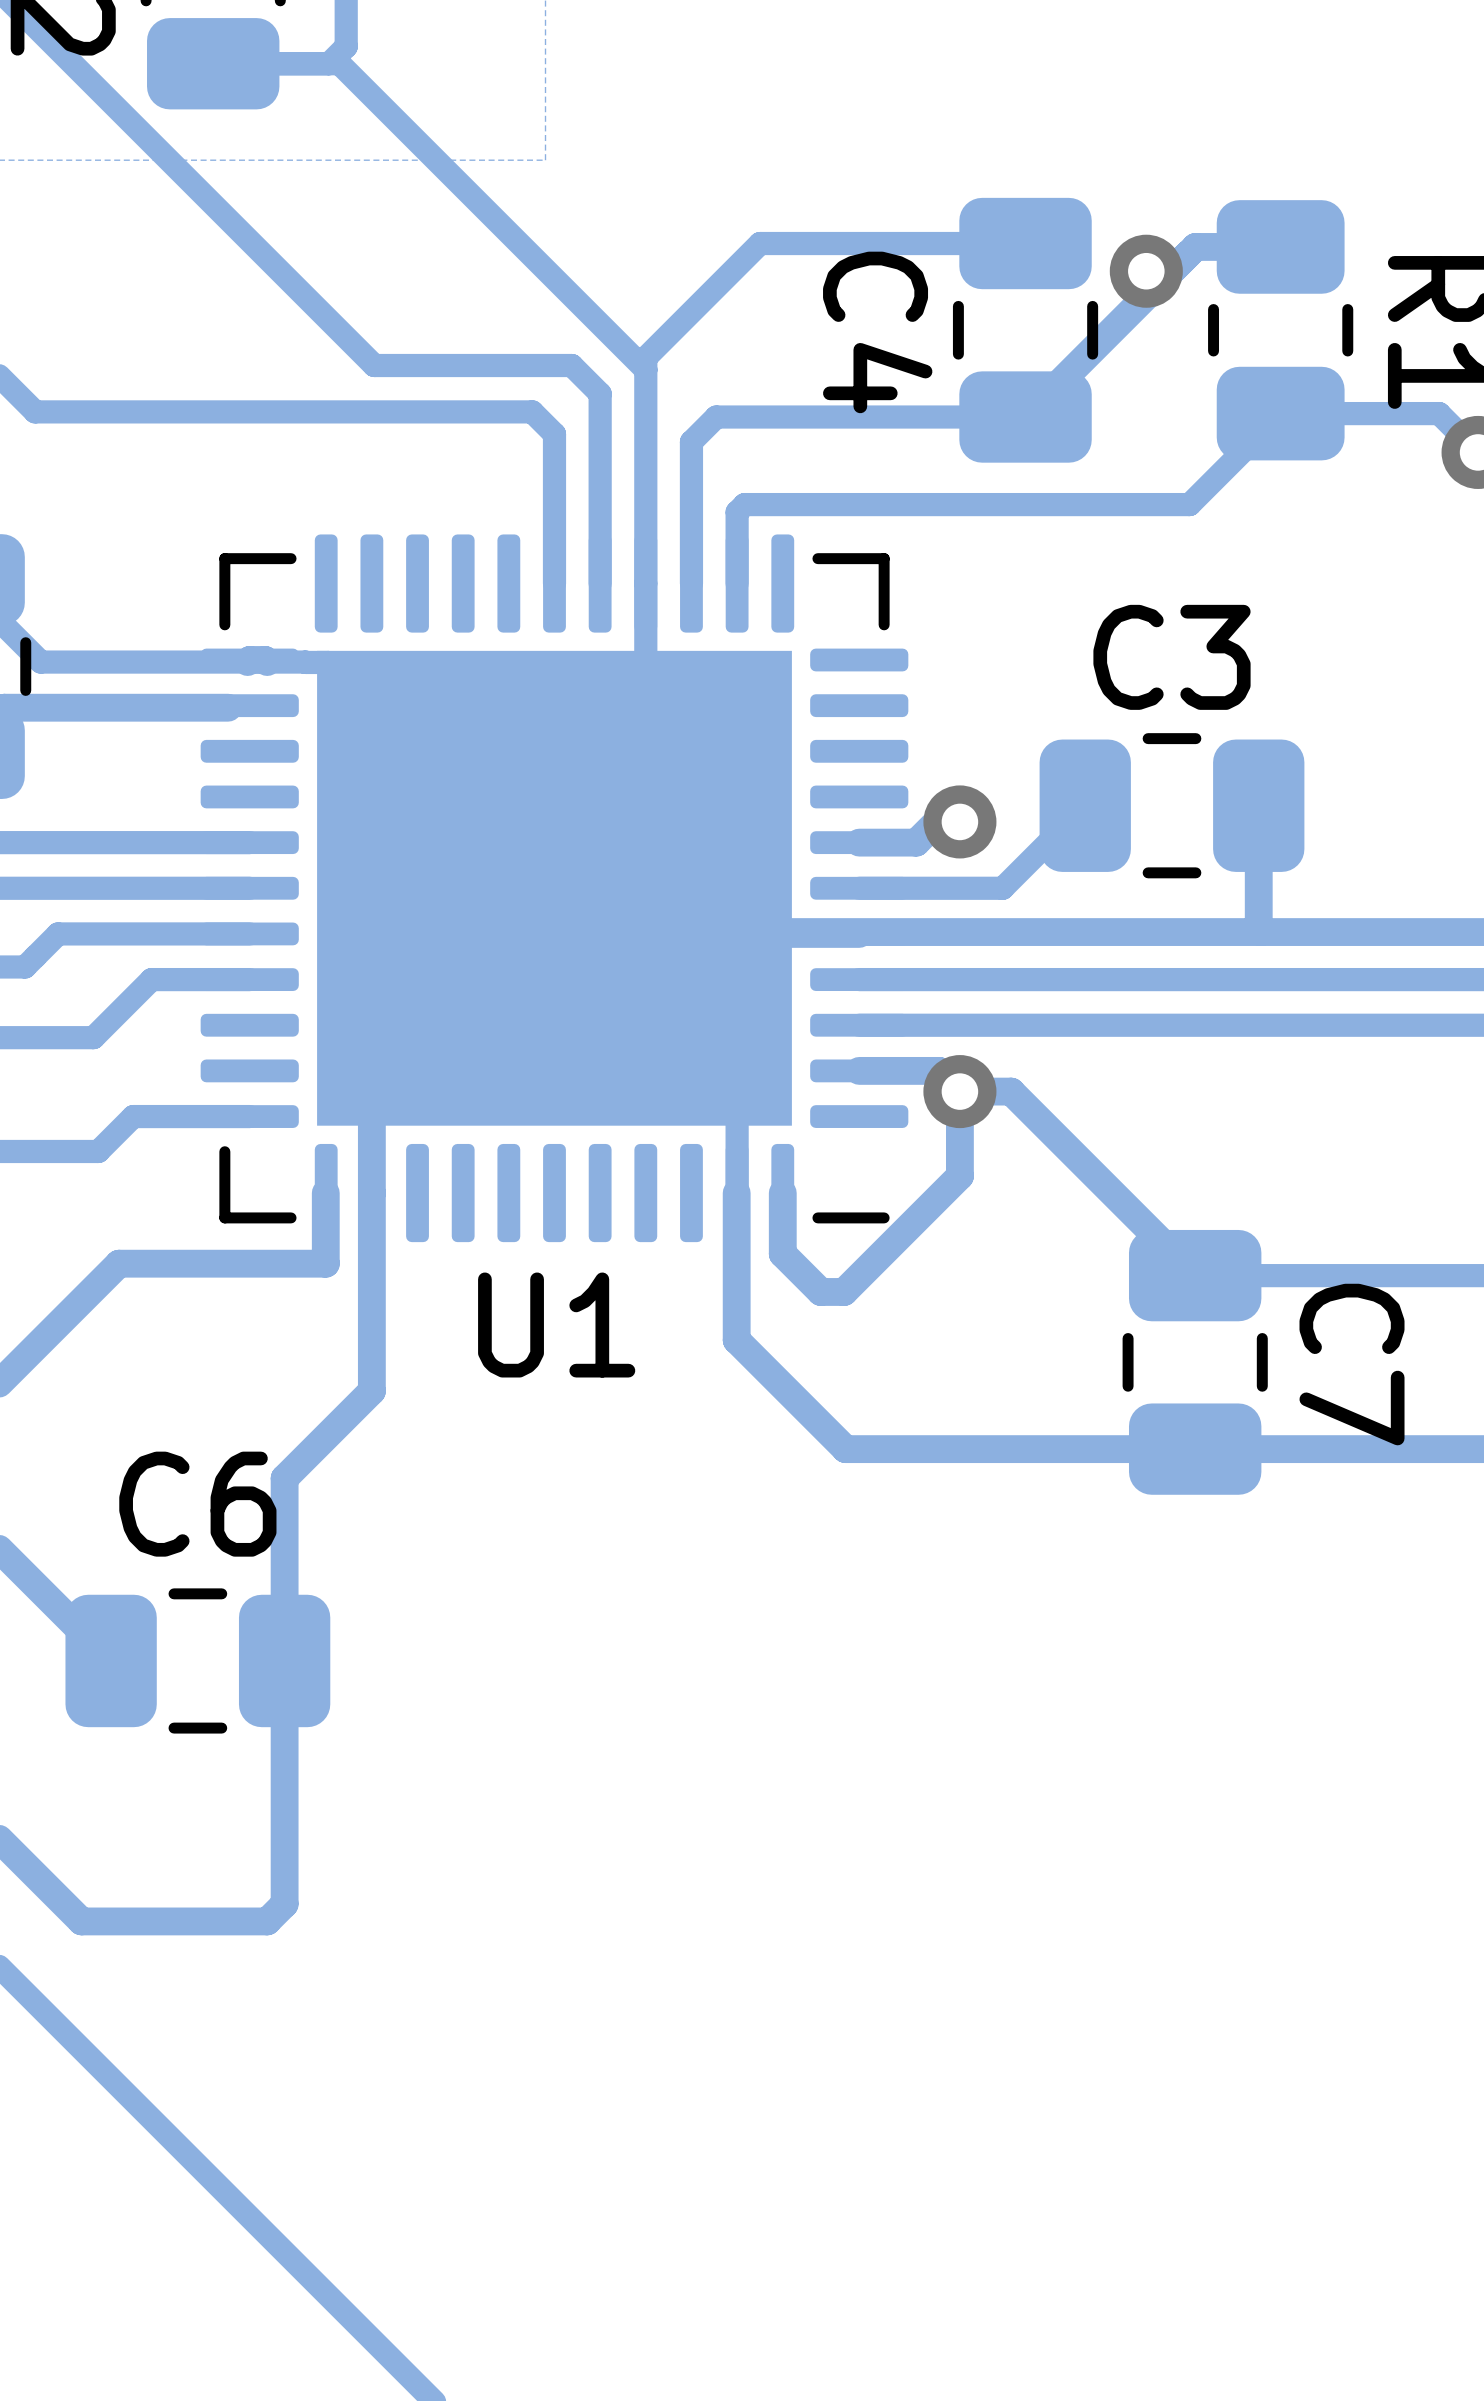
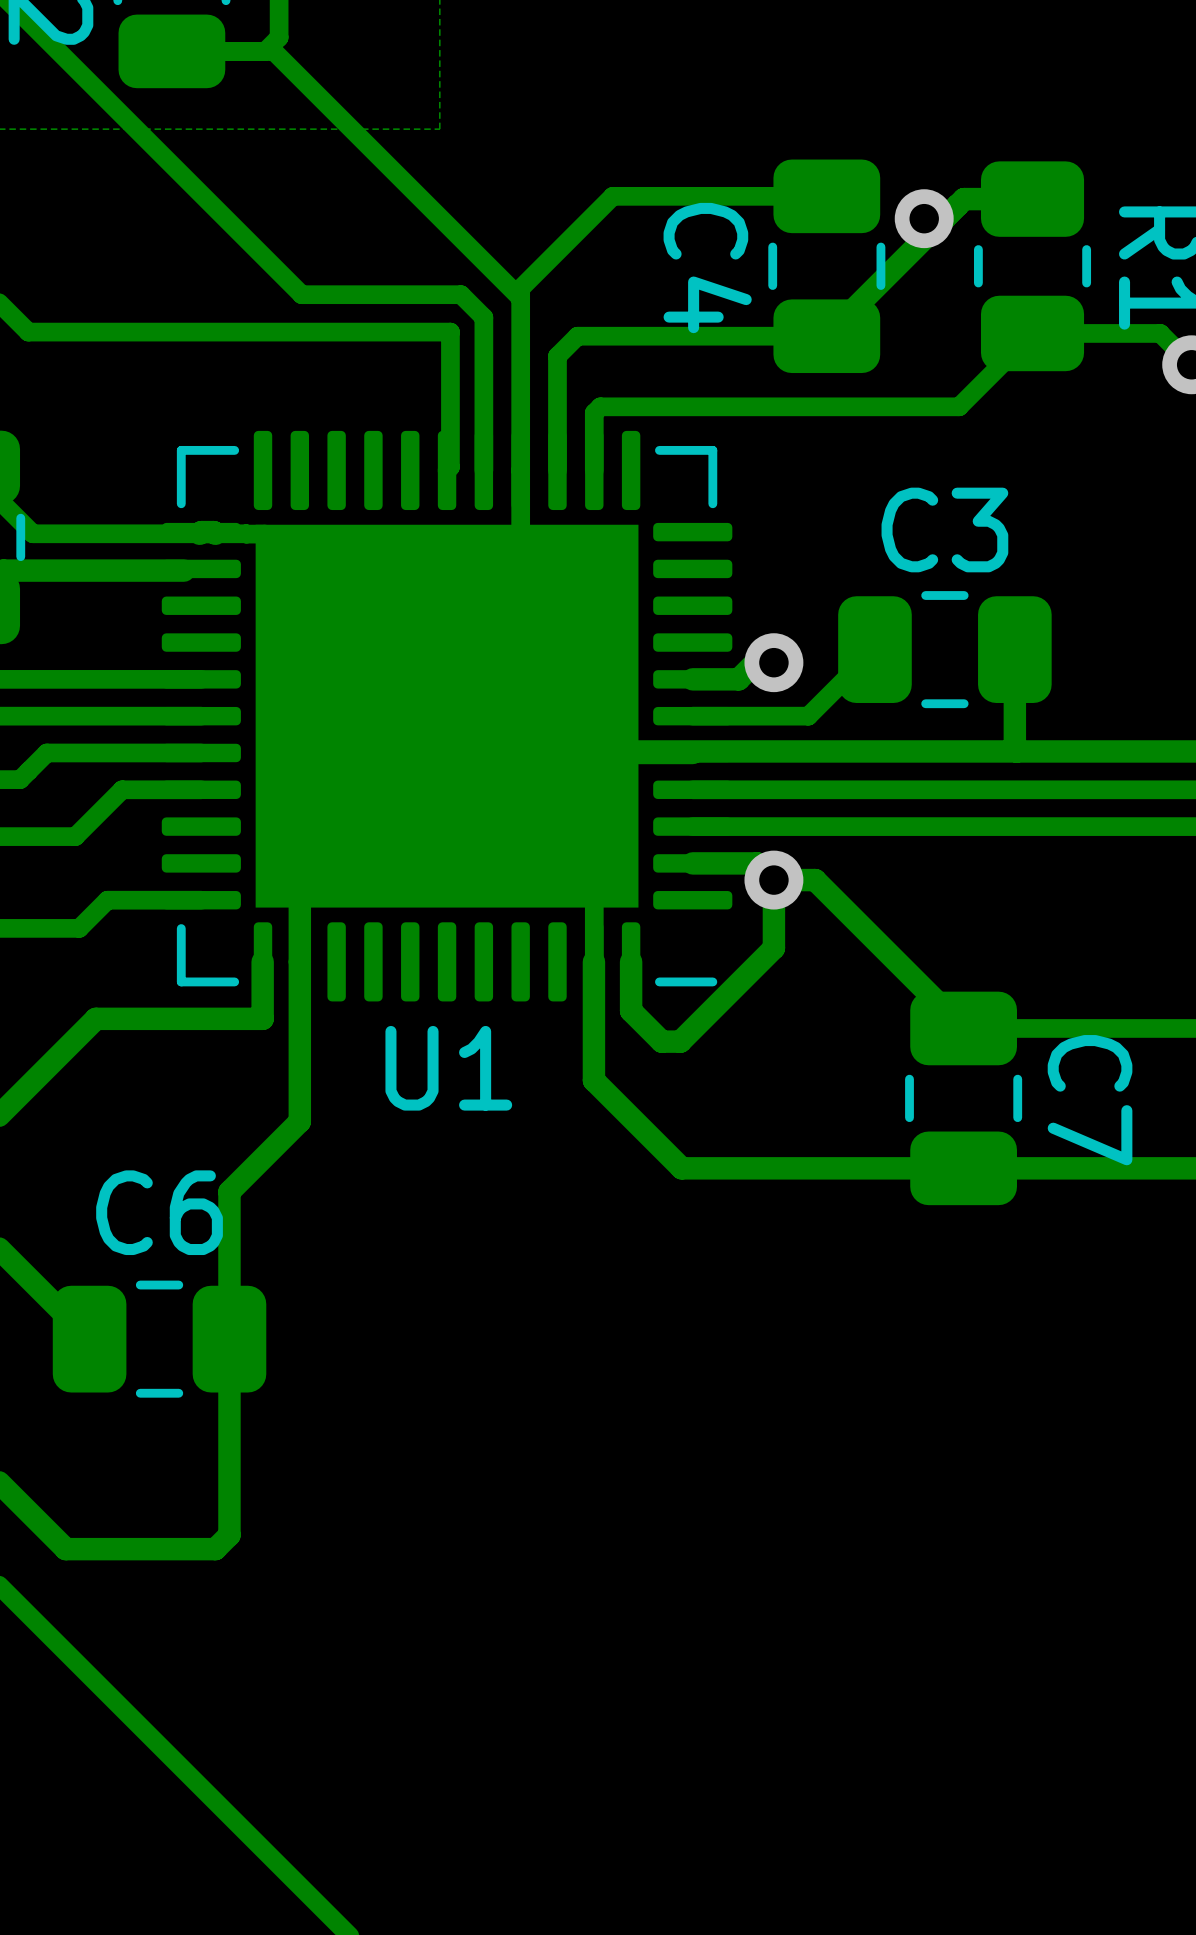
track: (532, 411) (554, 434) (554, 583) -> (429, 332) (450, 332) (450, 467) (447, 470)

